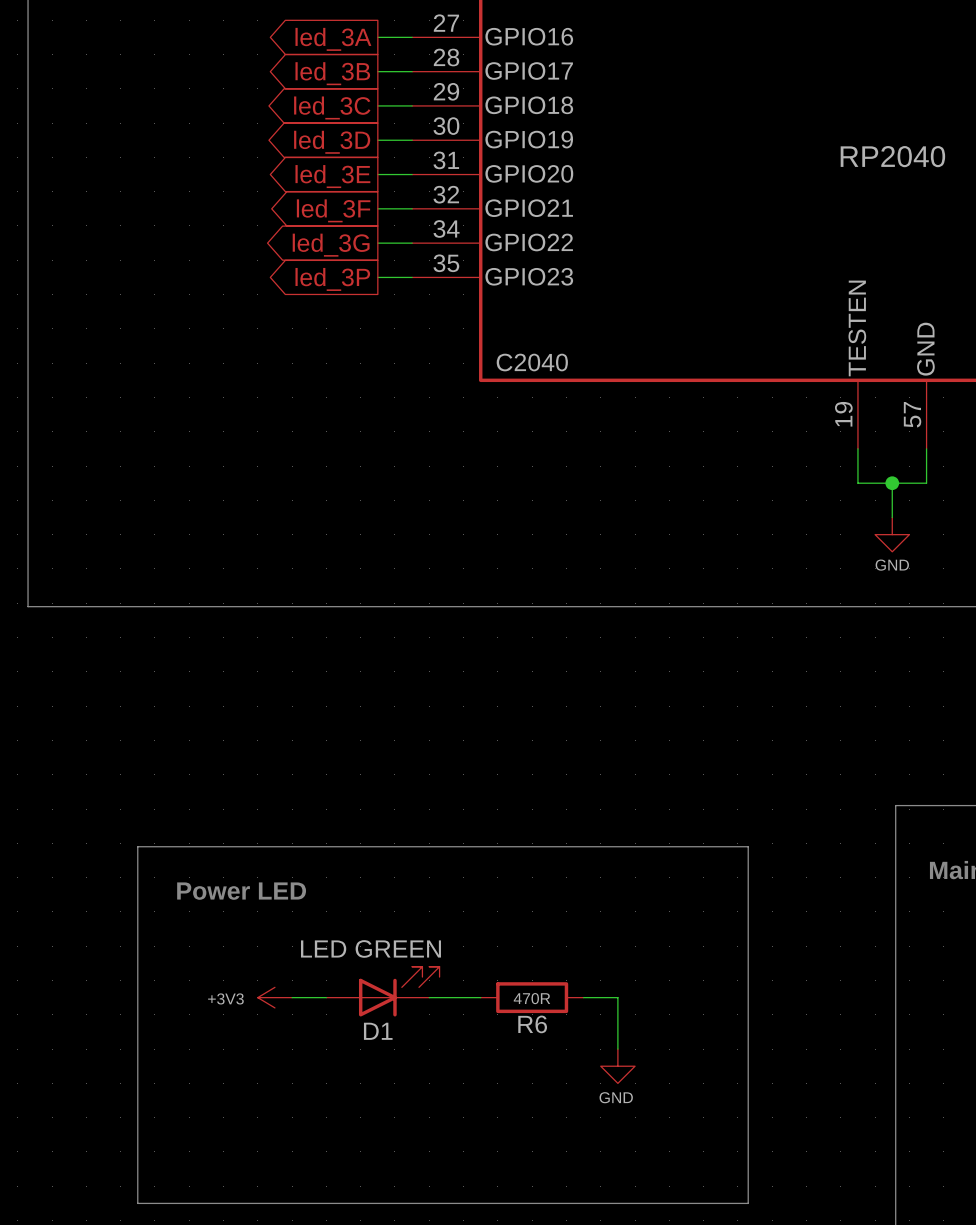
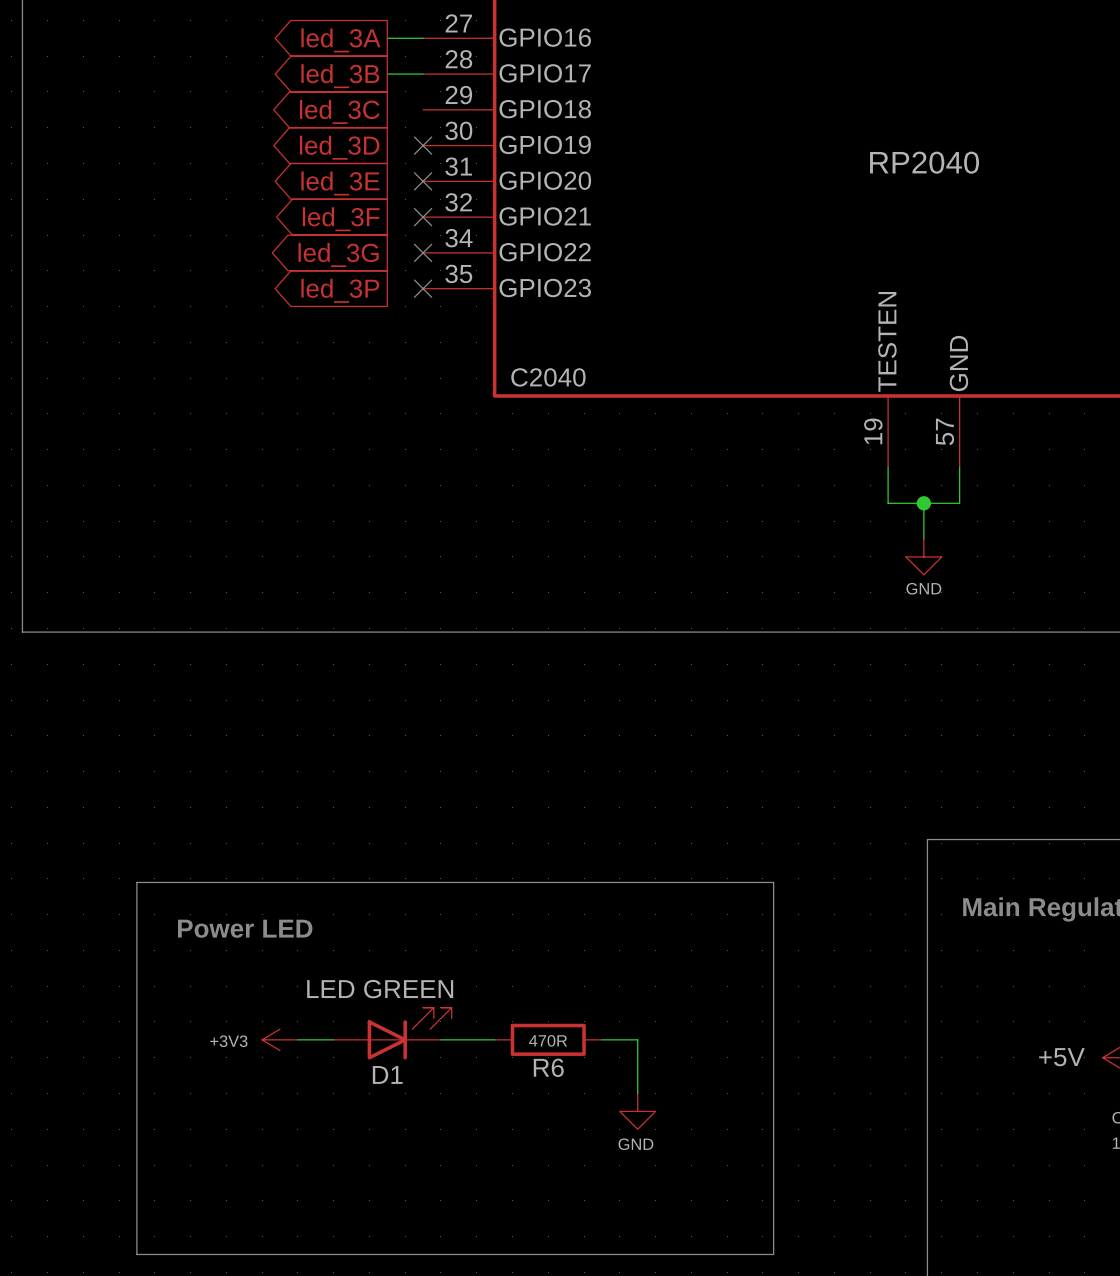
wire: (377, 105) (412, 105) -> none
wire: (377, 140) (412, 140) -> none
no-connect mark: none -> (423, 145)
wire: (377, 174) (412, 174) -> none
no-connect mark: none -> (423, 181)
wire: (377, 208) (412, 208) -> none
no-connect mark: none -> (423, 217)
wire: (377, 243) (412, 243) -> none
no-connect mark: none -> (423, 252)
wire: (377, 277) (412, 277) -> none
no-connect mark: none -> (423, 288)

